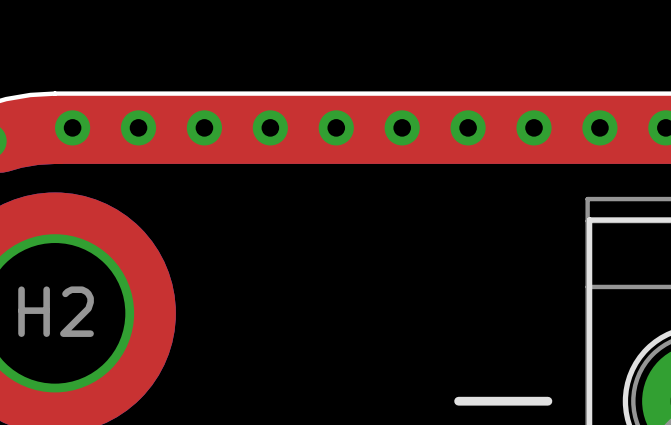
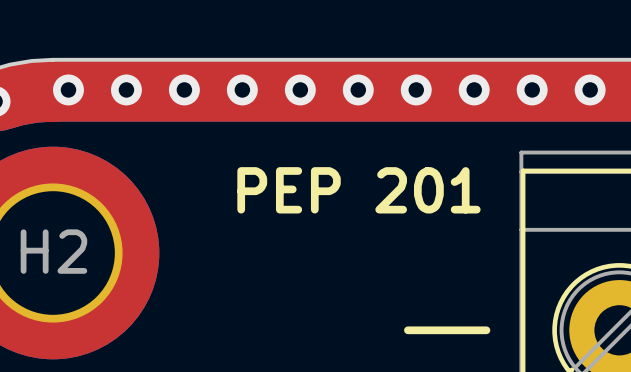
text: none -> PEP 201 (358, 190)

